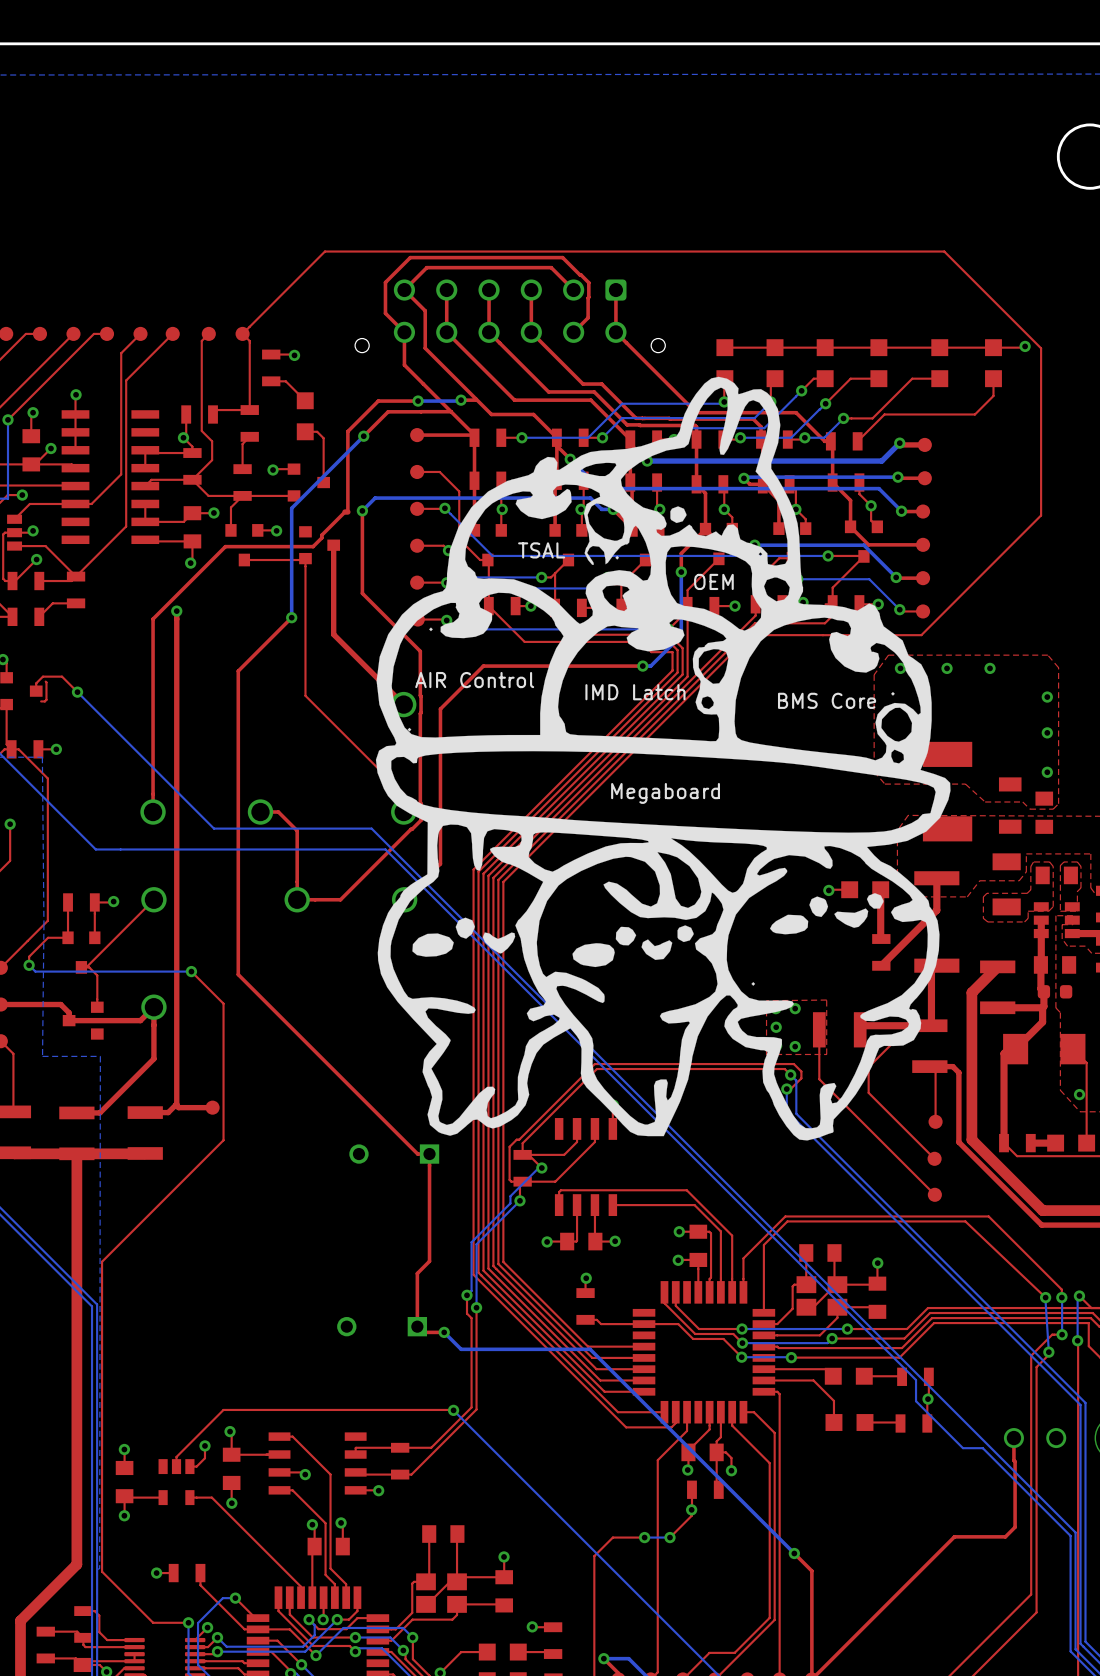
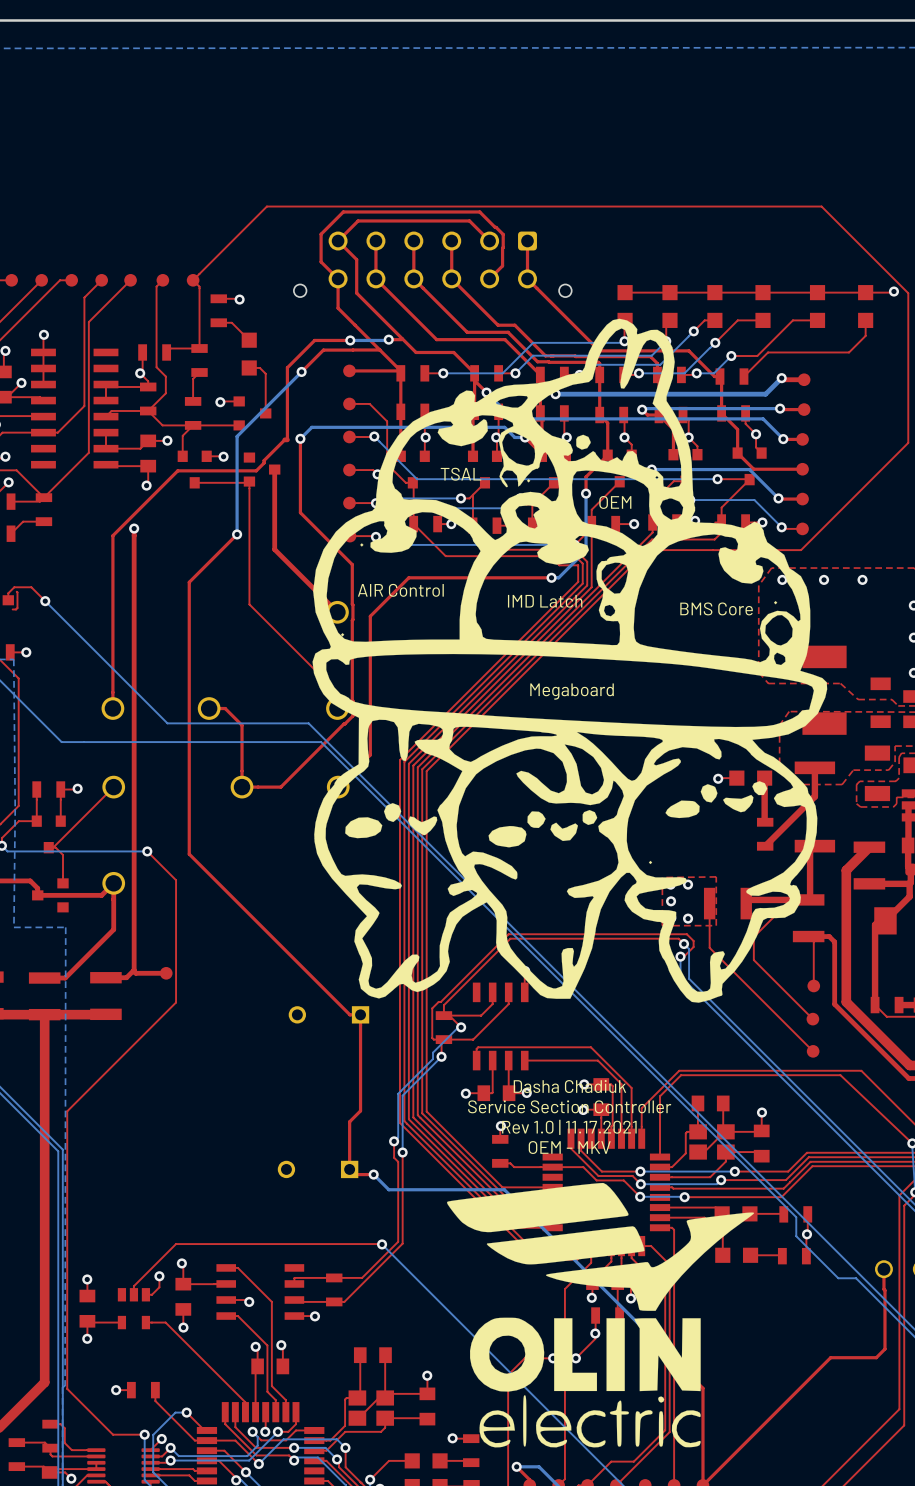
text: none -> Dasha Chadiuk (569, 1086)
text: none -> Service Section Controller (569, 1106)
text: none -> Rev 1.0 | 11.17.2021 (569, 1127)
text: none -> OEM - MKV (569, 1147)
drawing: none -> [447, 1182, 755, 1448]

